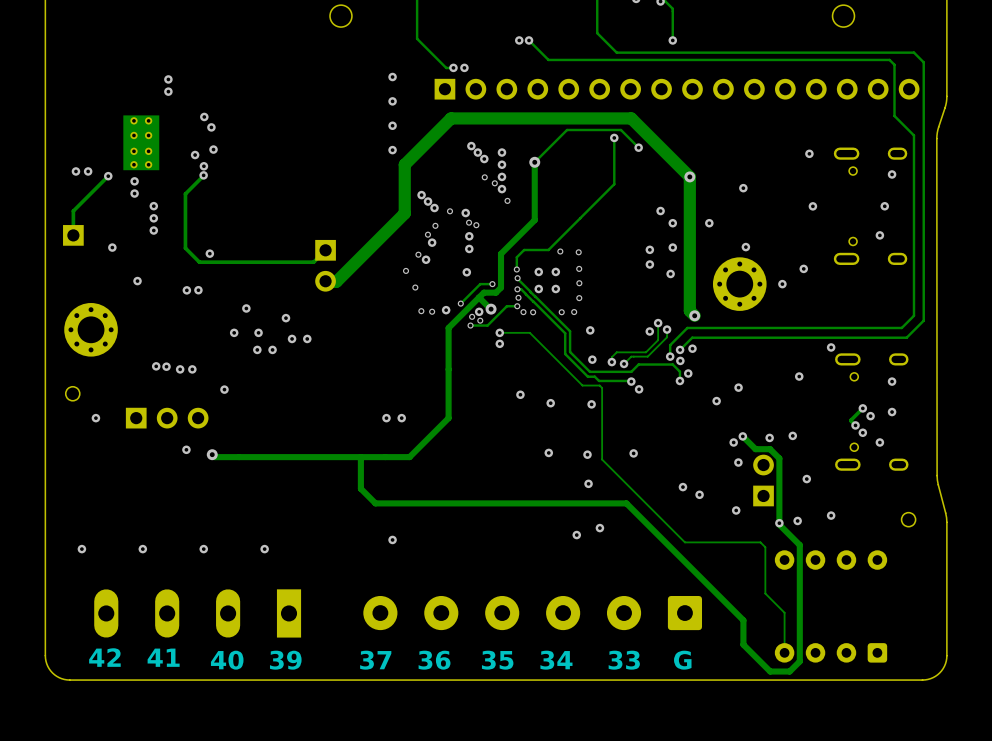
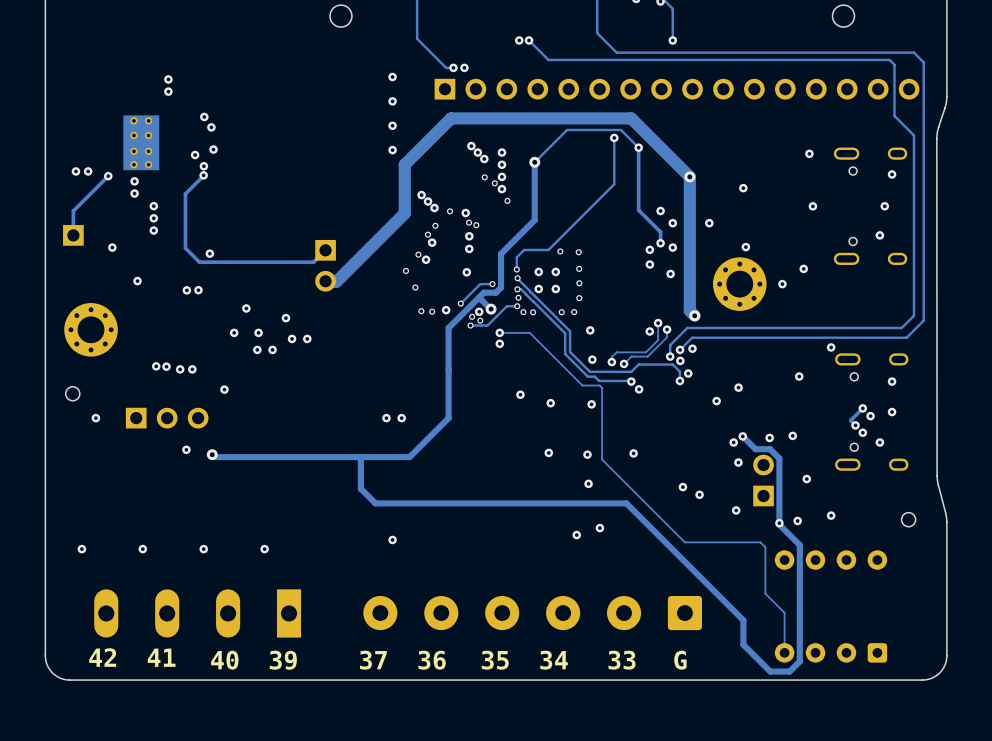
track: none -> (638, 147) (638, 210) (660, 232) (660, 243)
via: none -> (660, 243)

